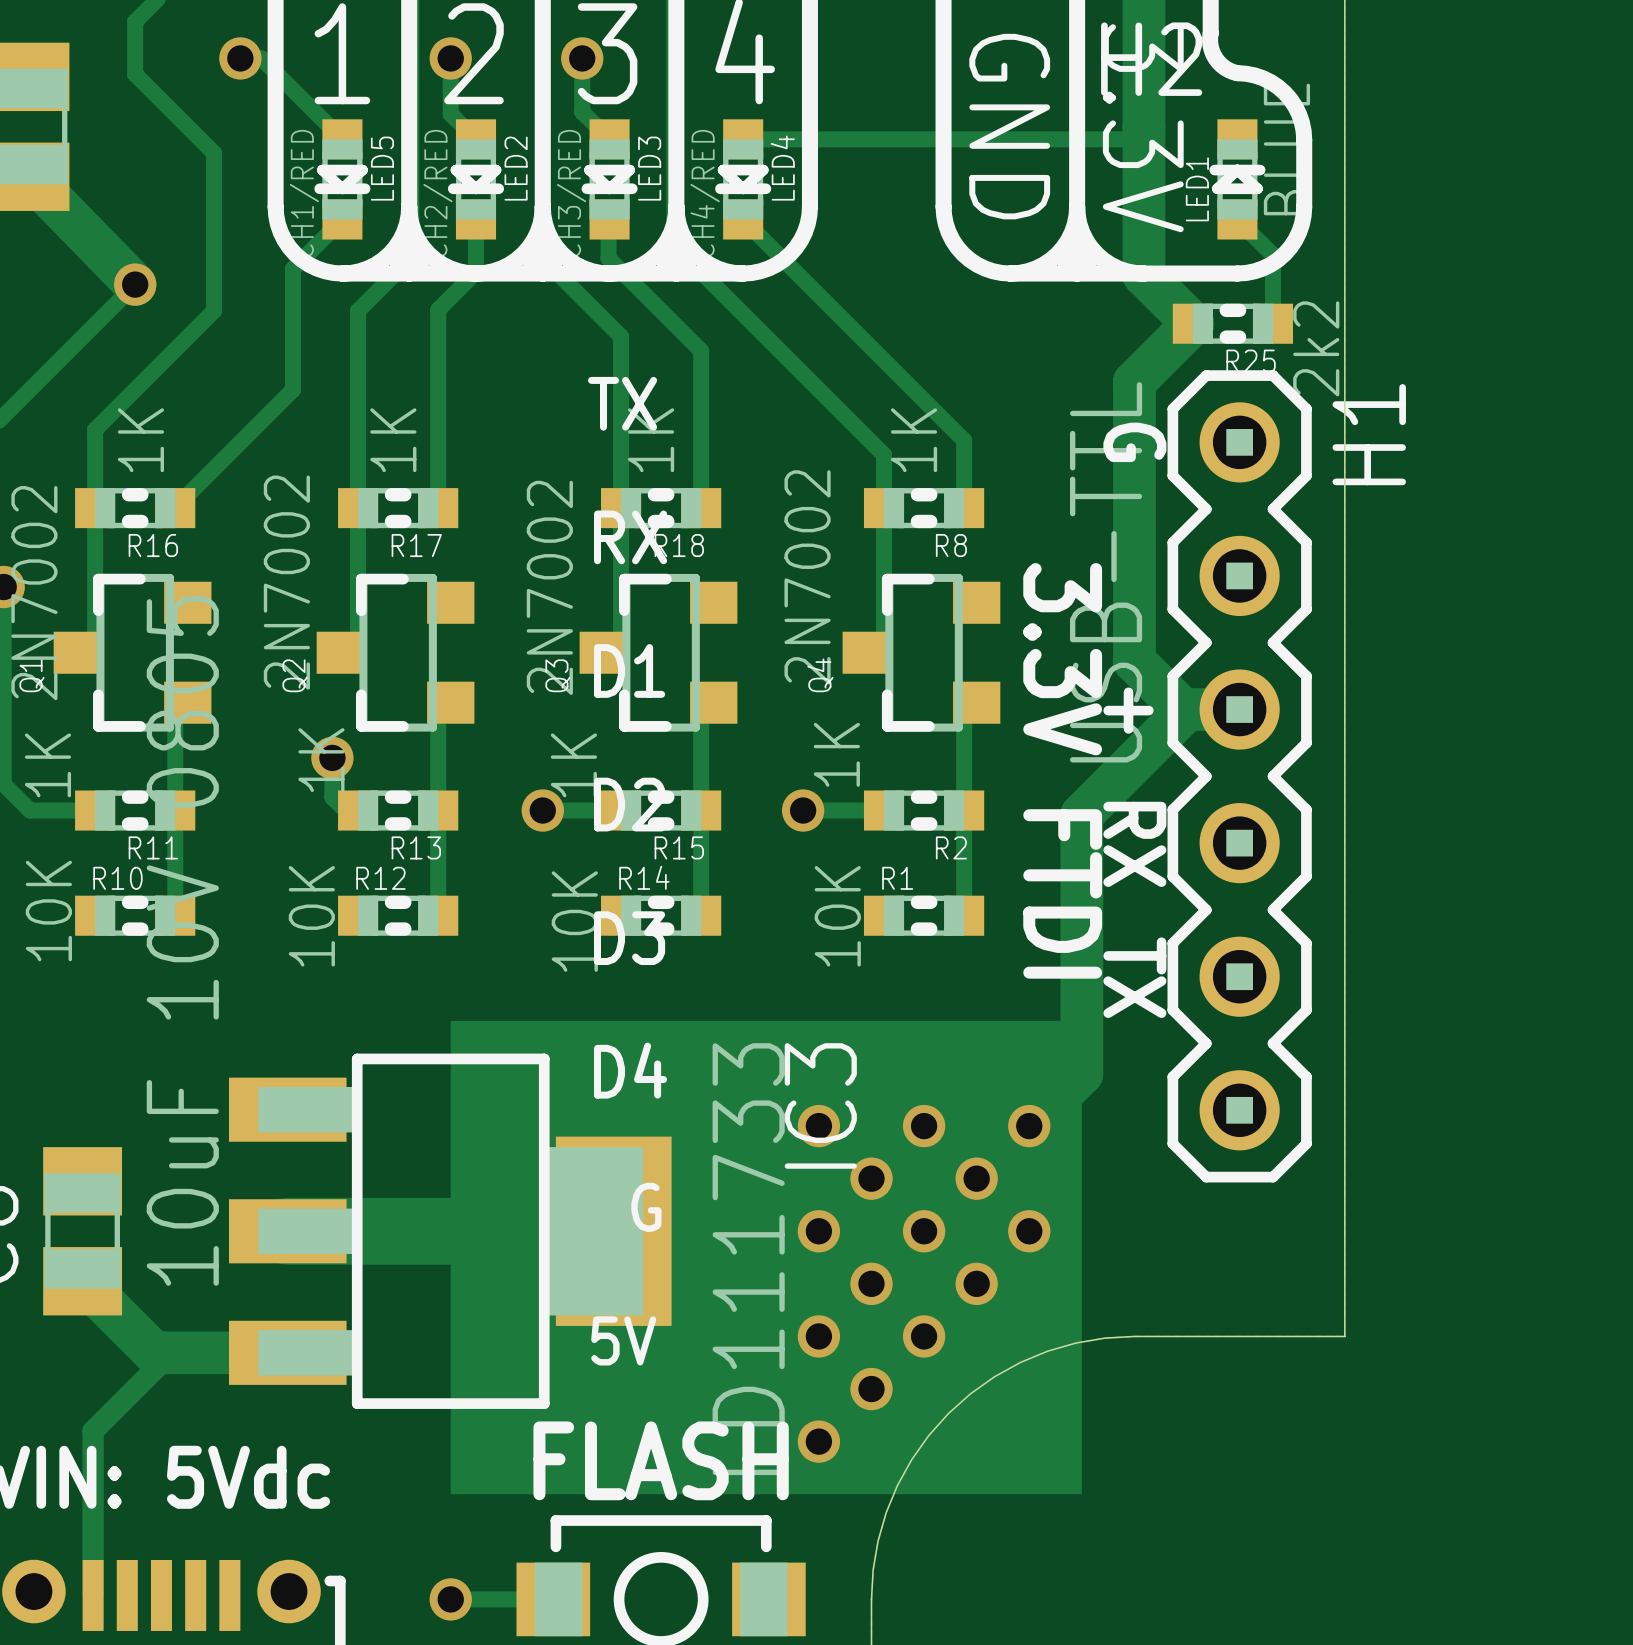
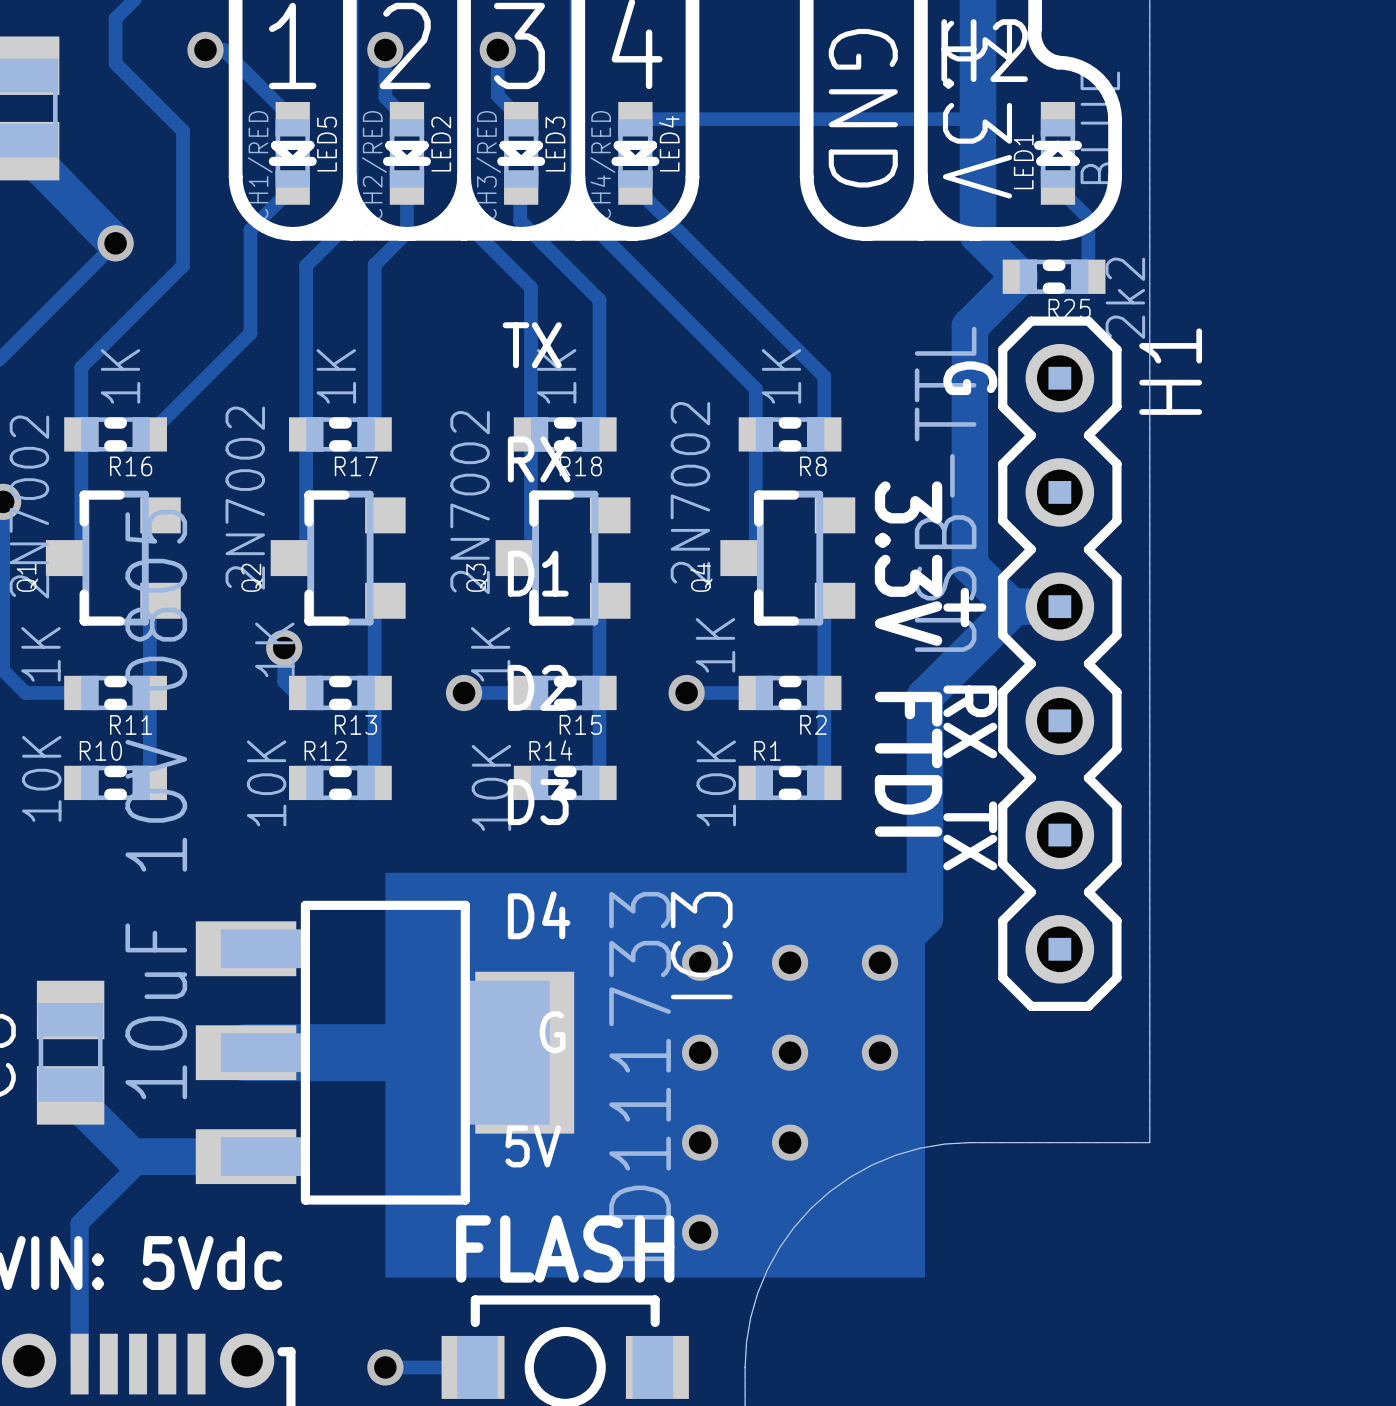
via: (871, 1178) -> none
via: (976, 1178) -> none
via: (871, 1283) -> none
via: (976, 1283) -> none
via: (871, 1389) -> none

